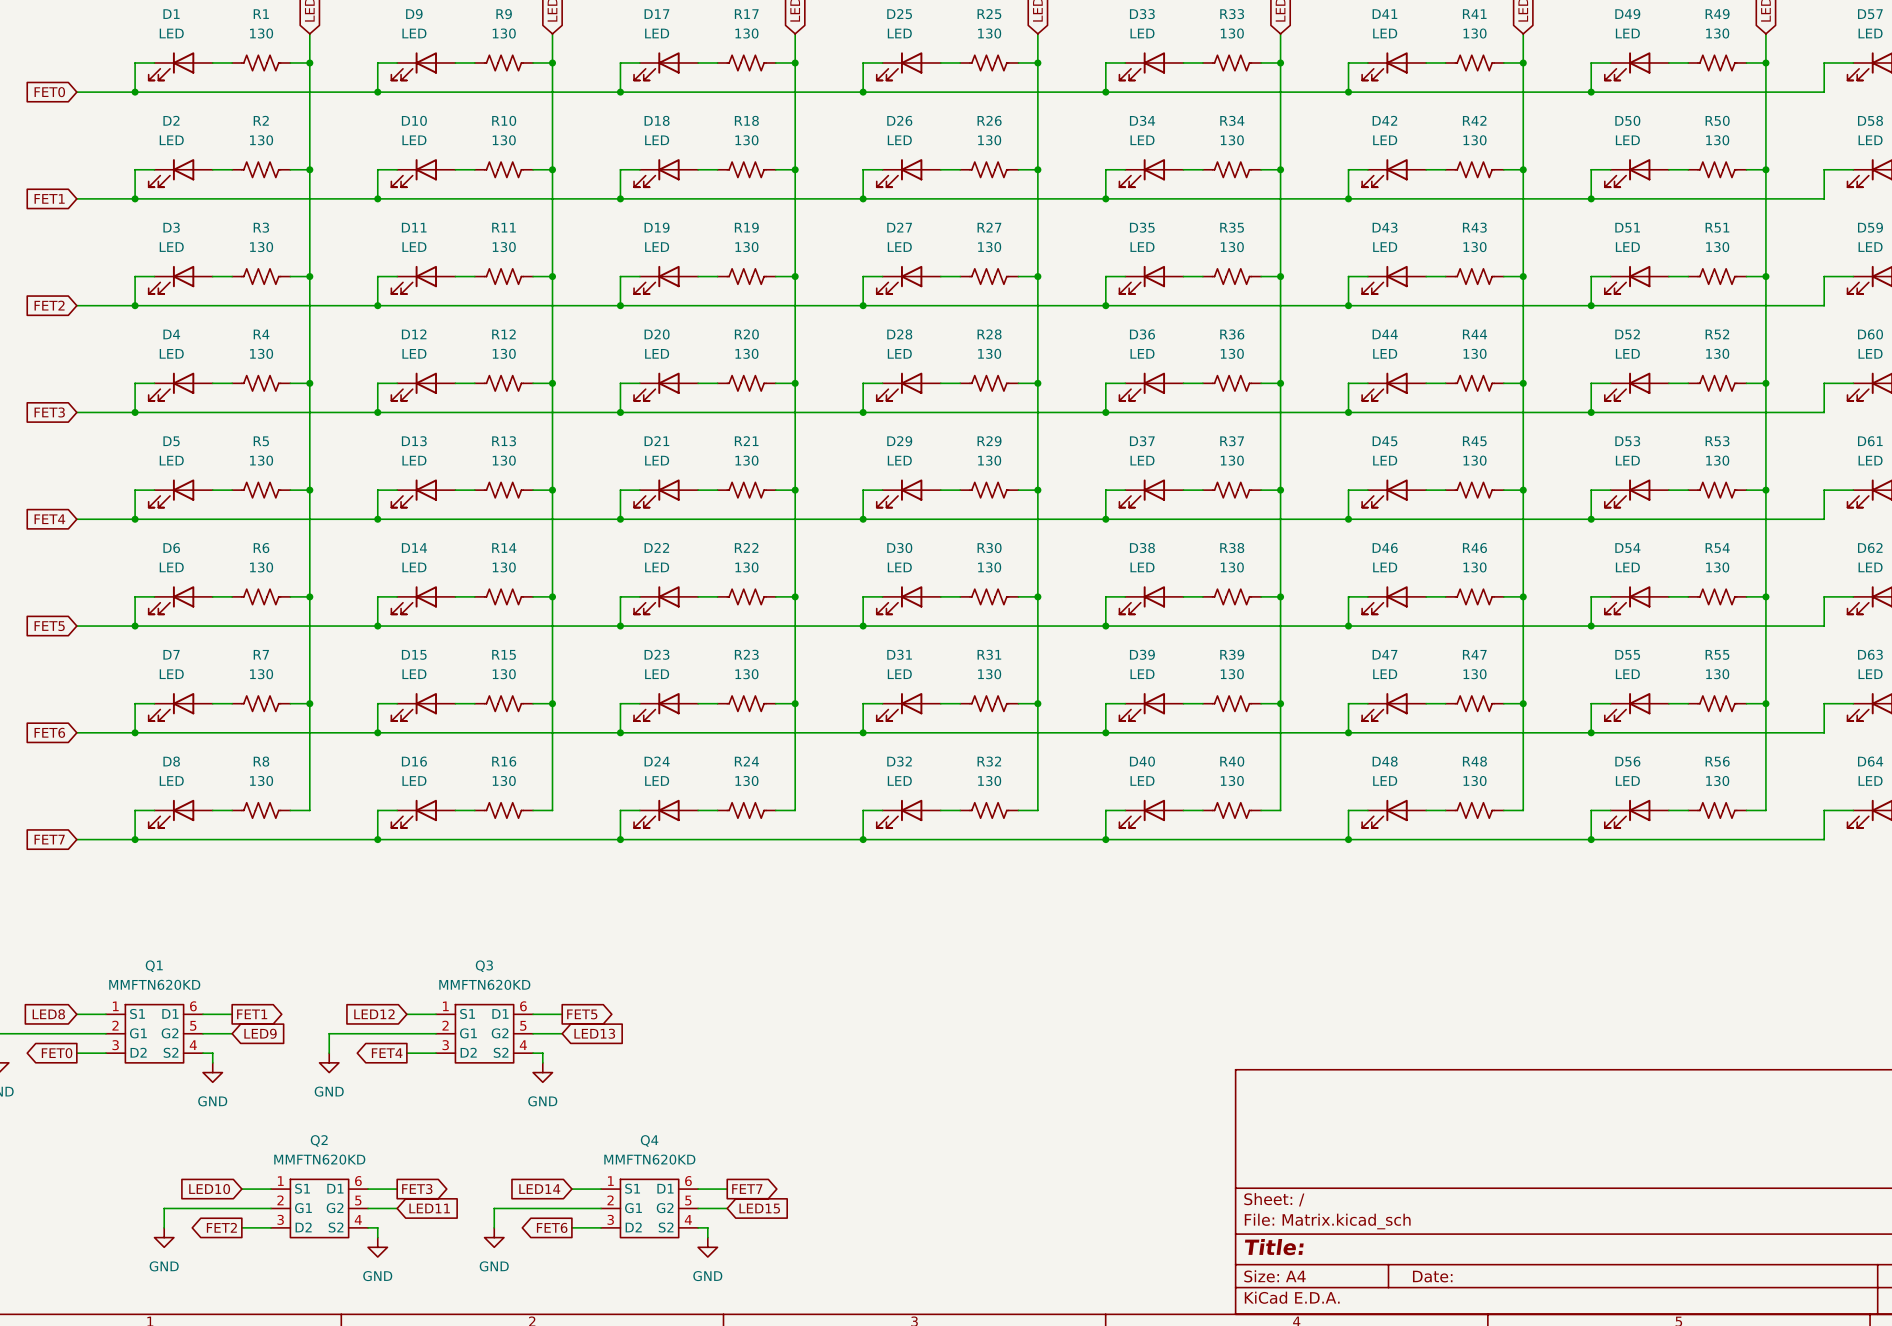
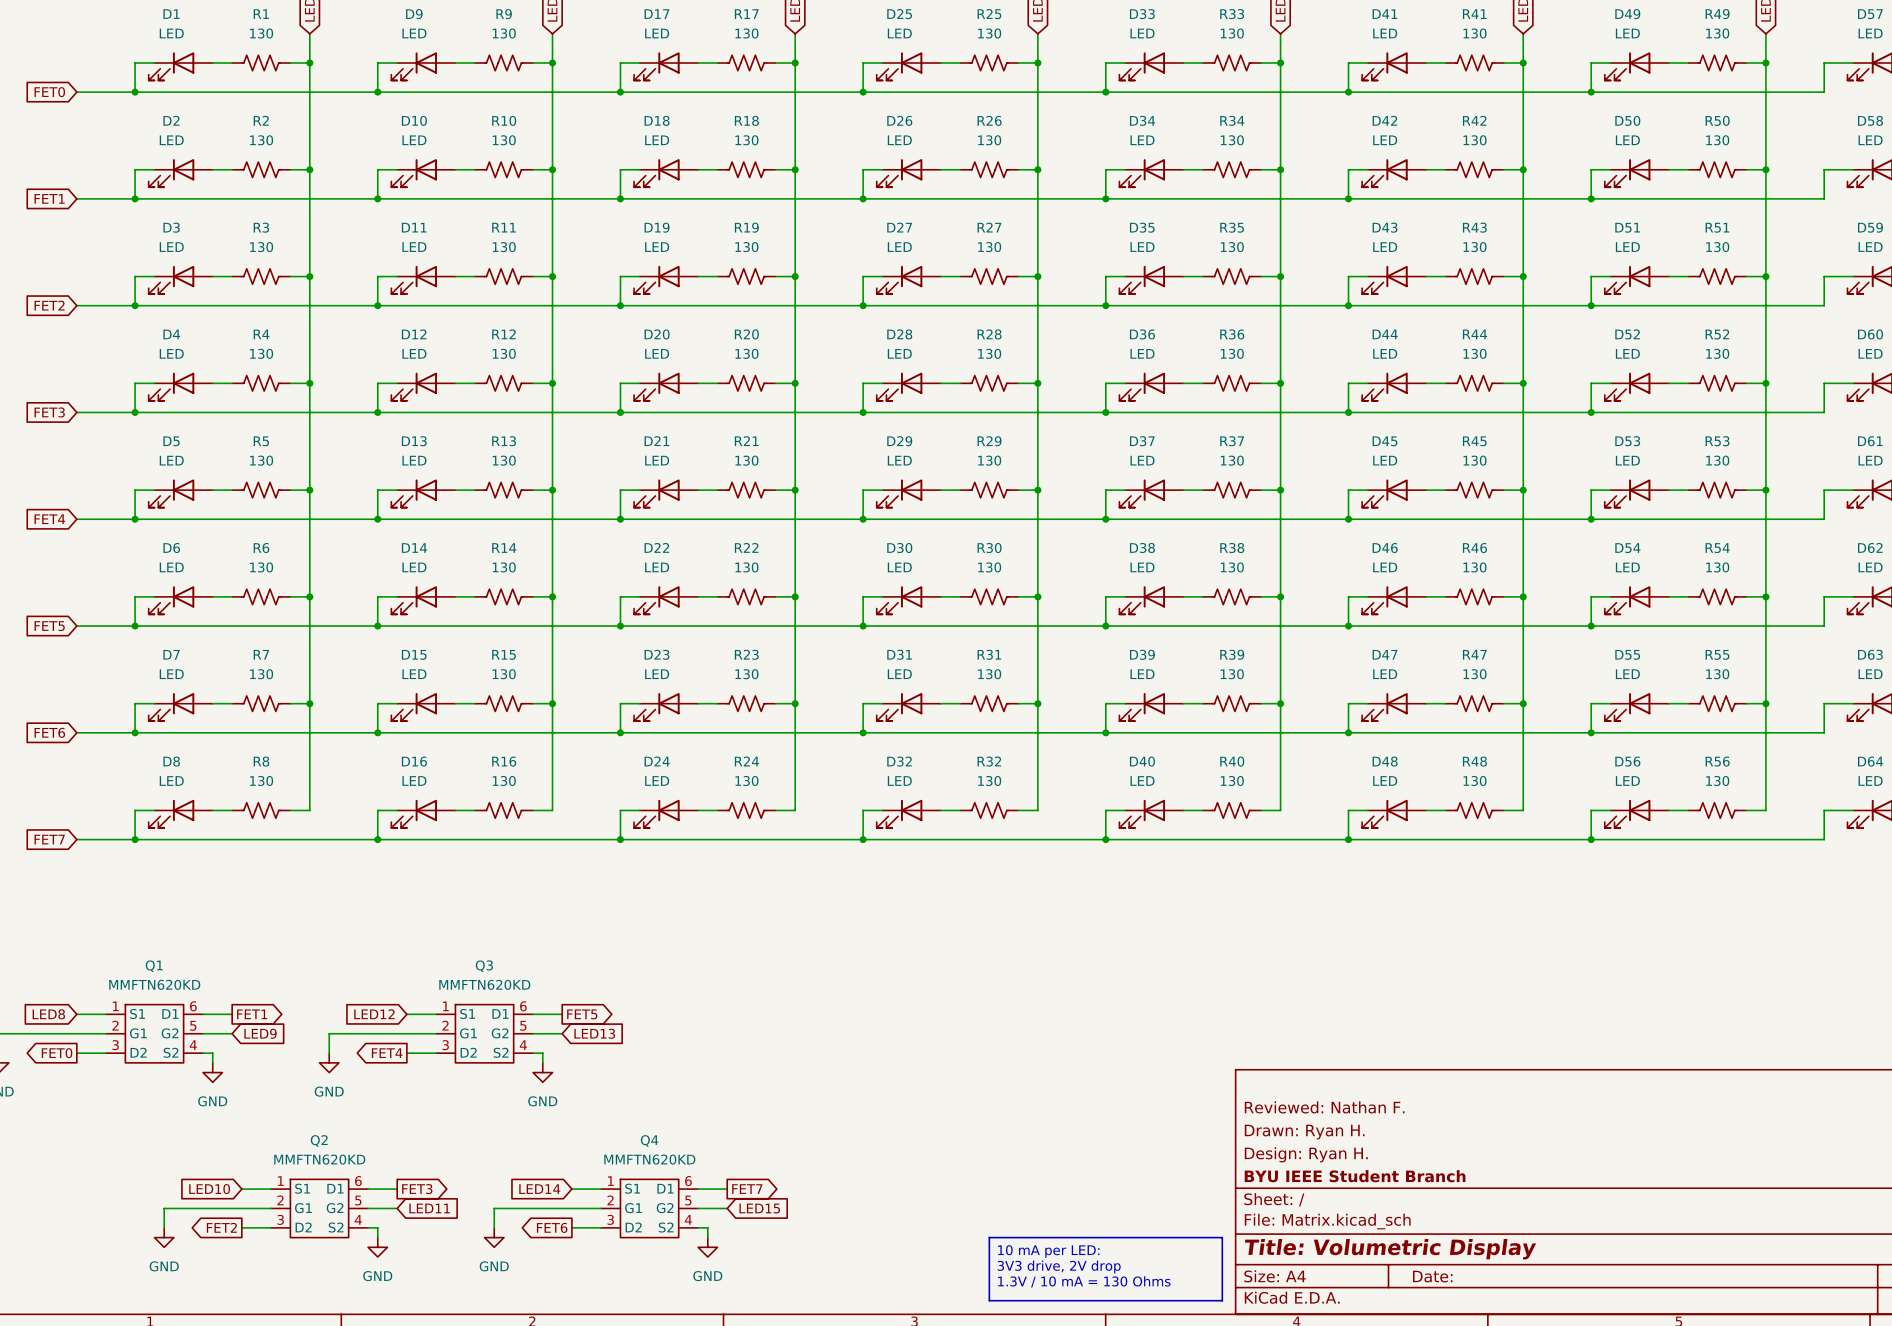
title block: none -> Reviewed: Nathan F. (1324, 1107)
title block: none -> Drawn: Ryan H. (1304, 1132)
title block: none -> Design: Ryan H. (1306, 1154)
title block: none -> BYU IEEE Student Branch (1355, 1176)
line: none -> (989, 1237) (1222, 1237) (1222, 1300) (989, 1300) (989, 1237)
title block: Title: (1274, 1247) -> Title: Volumetric Display (1390, 1249)
text: none -> 10 mA per LED: (1048, 1251)
text: none -> 3V3 drive, 2V drop (1059, 1267)
text: none -> 1.3V / 10 mA = 130 Ohms (1084, 1281)

